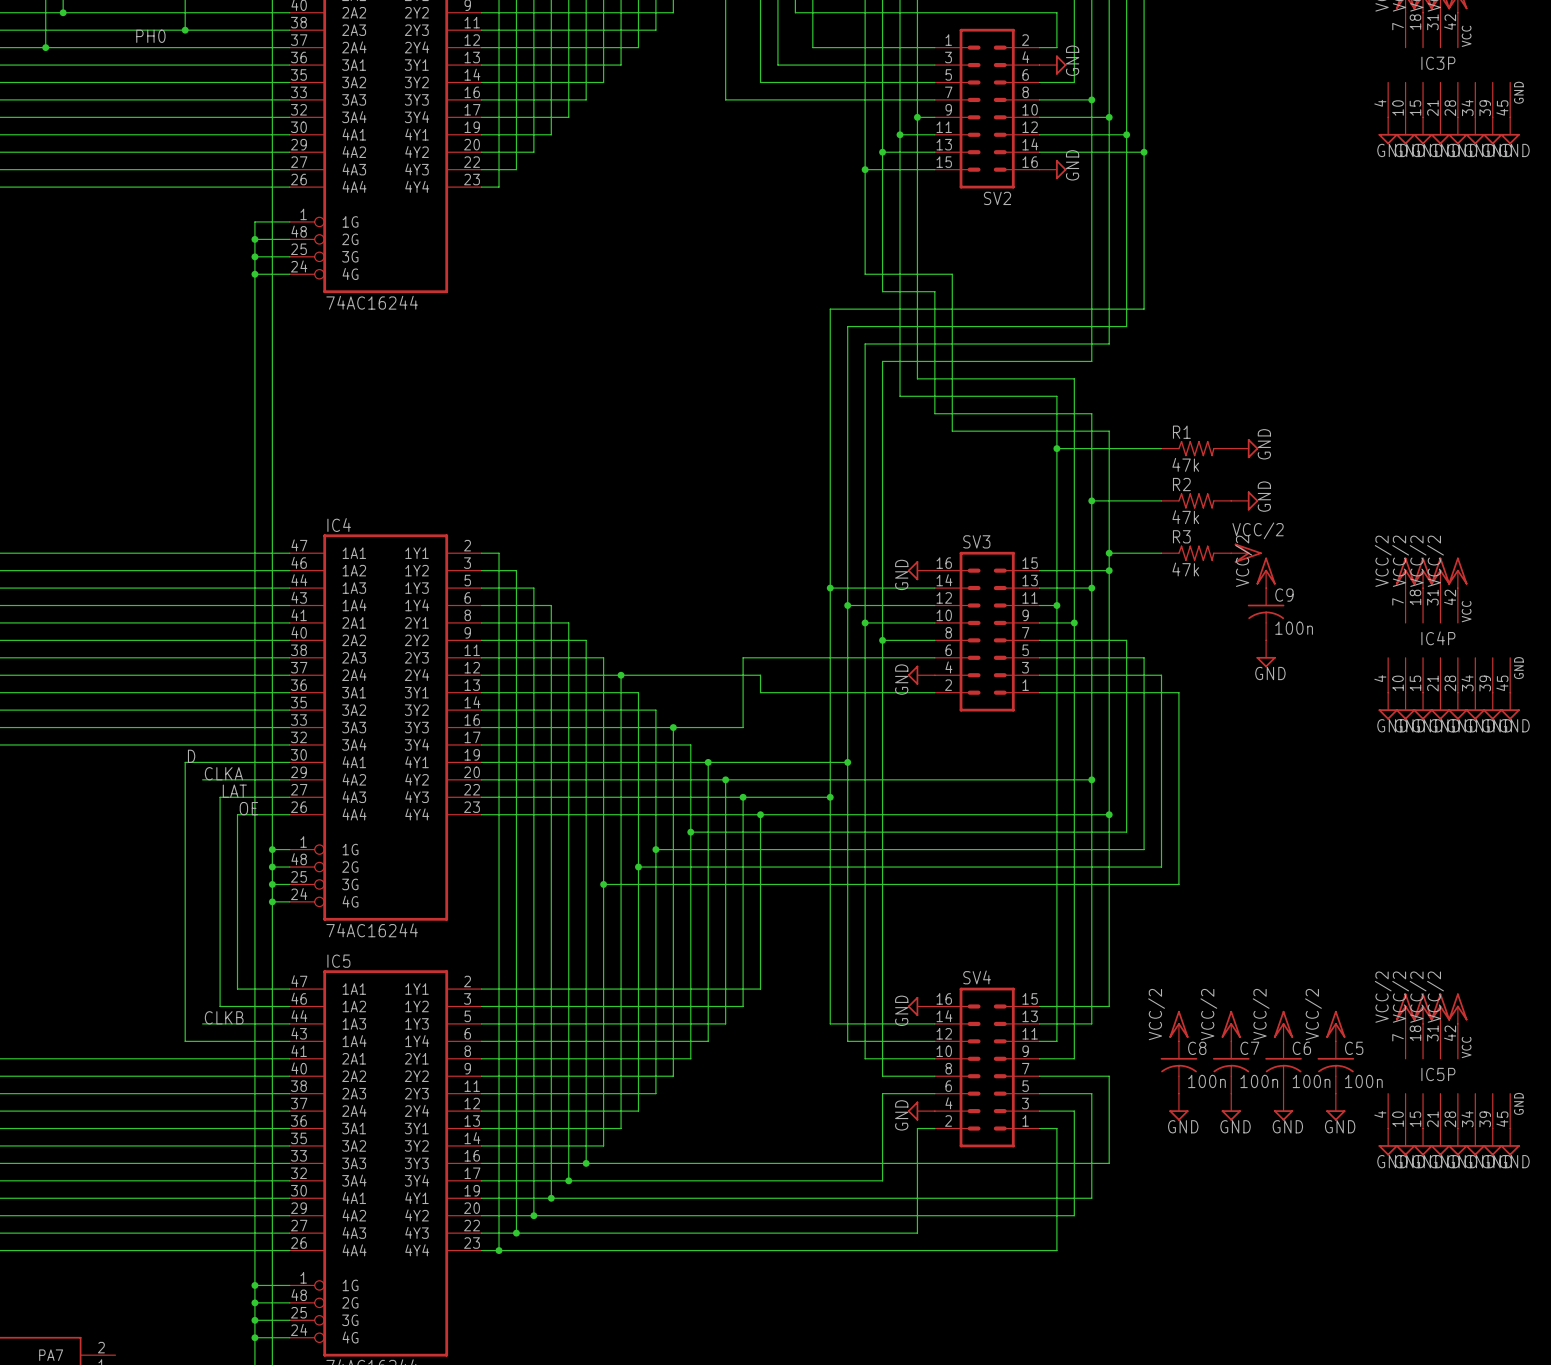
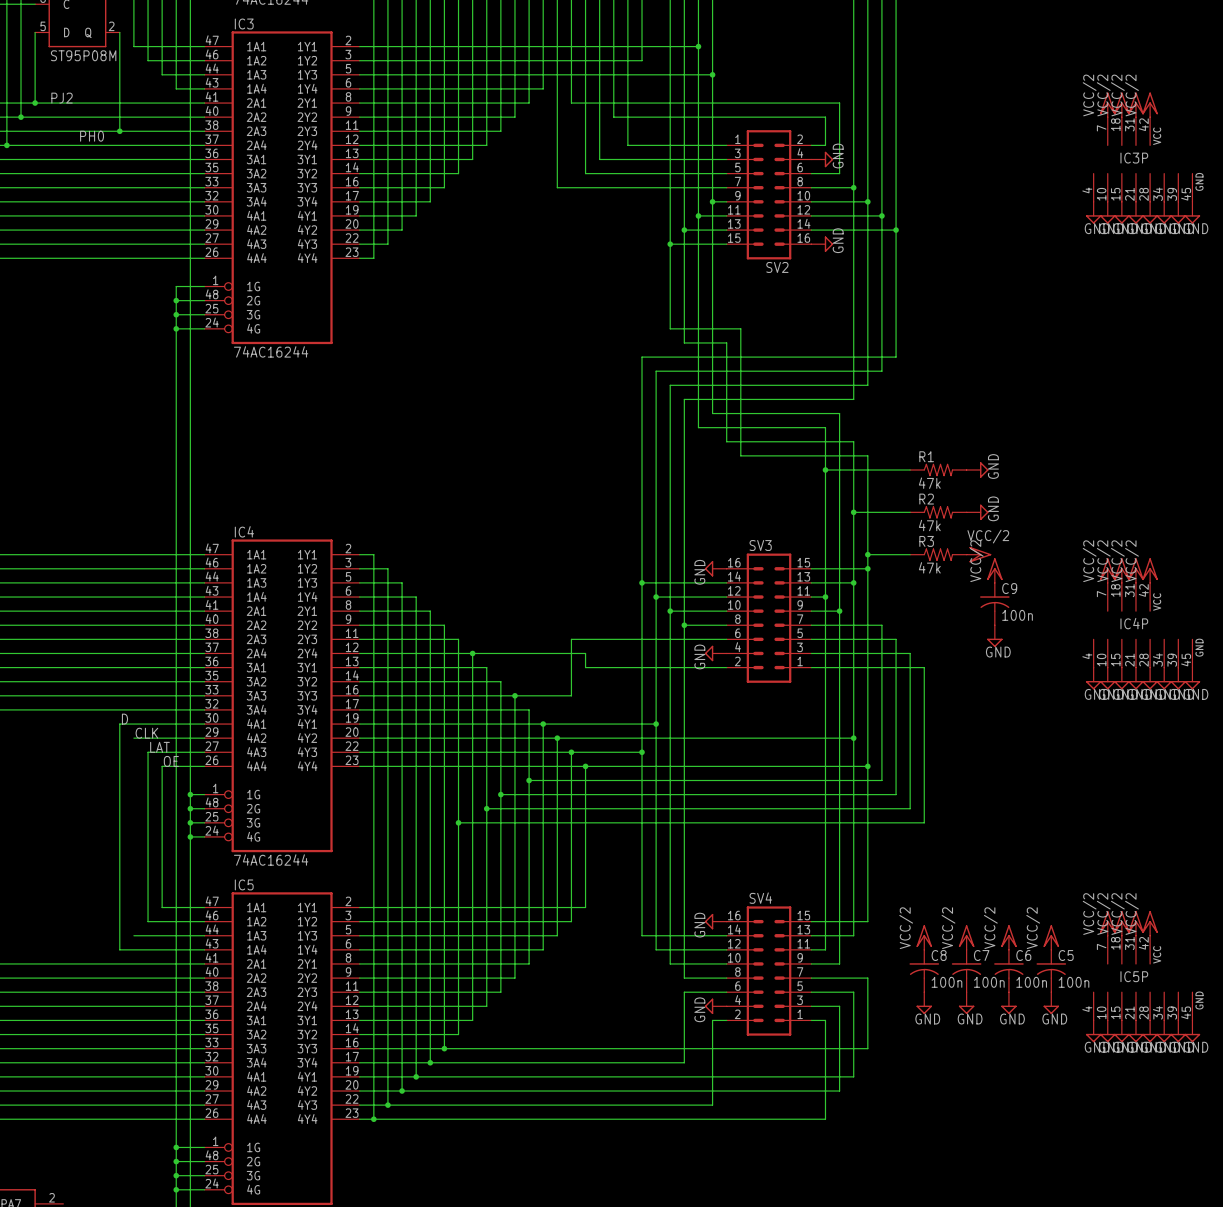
label: CLKA (223, 773) -> CLK (146, 733)
label: CLKB (224, 1017) -> none

